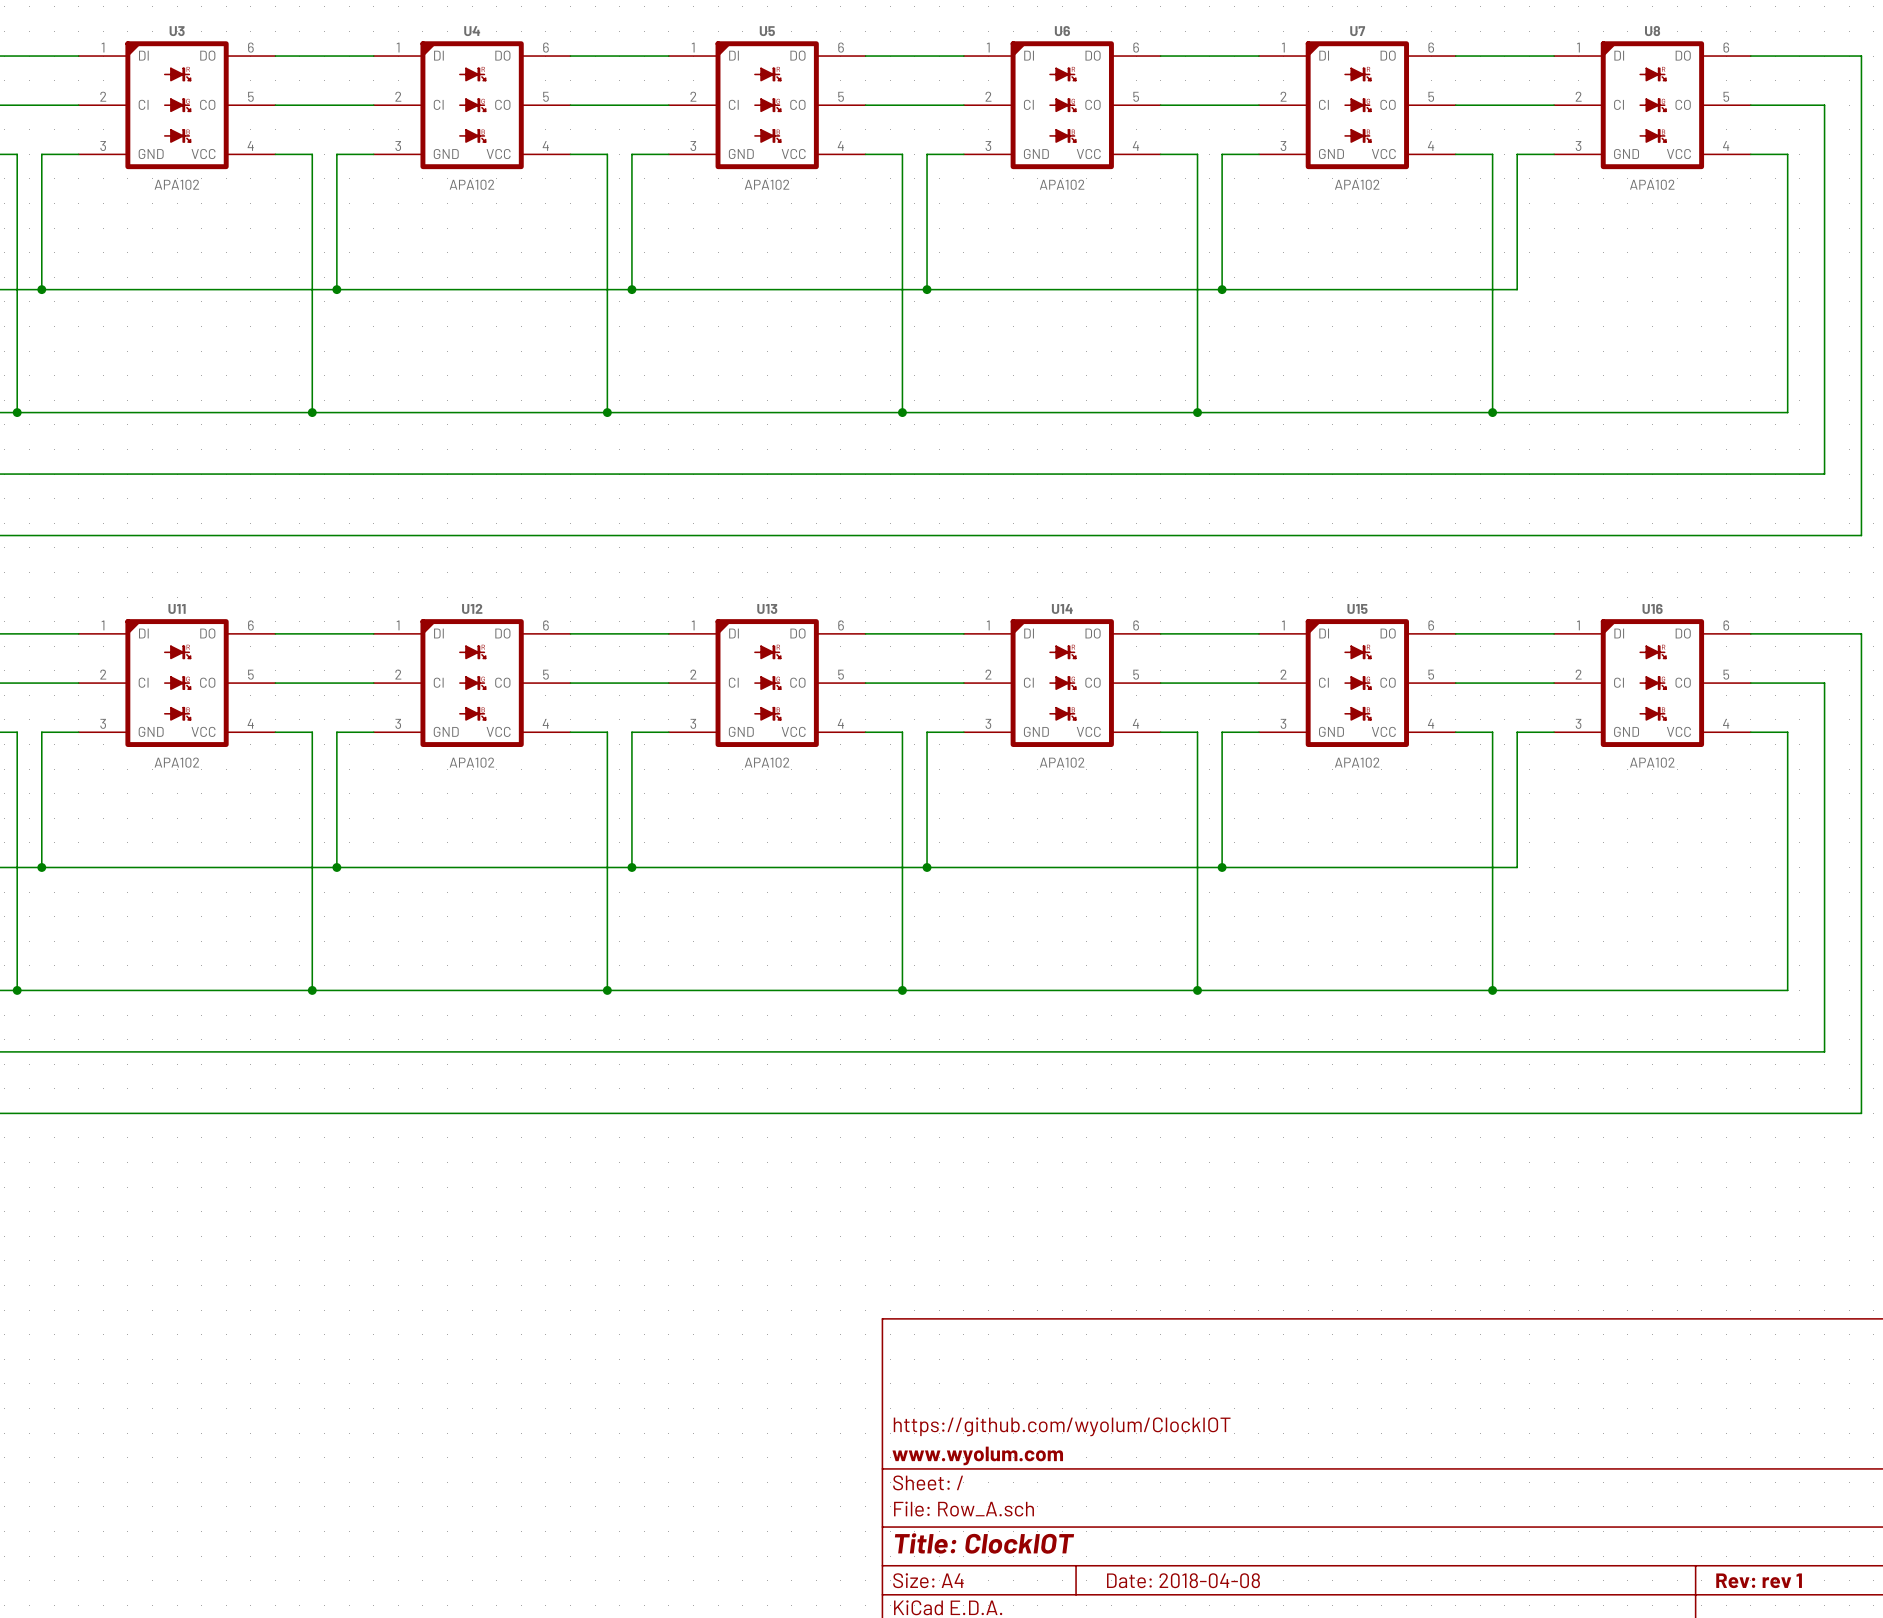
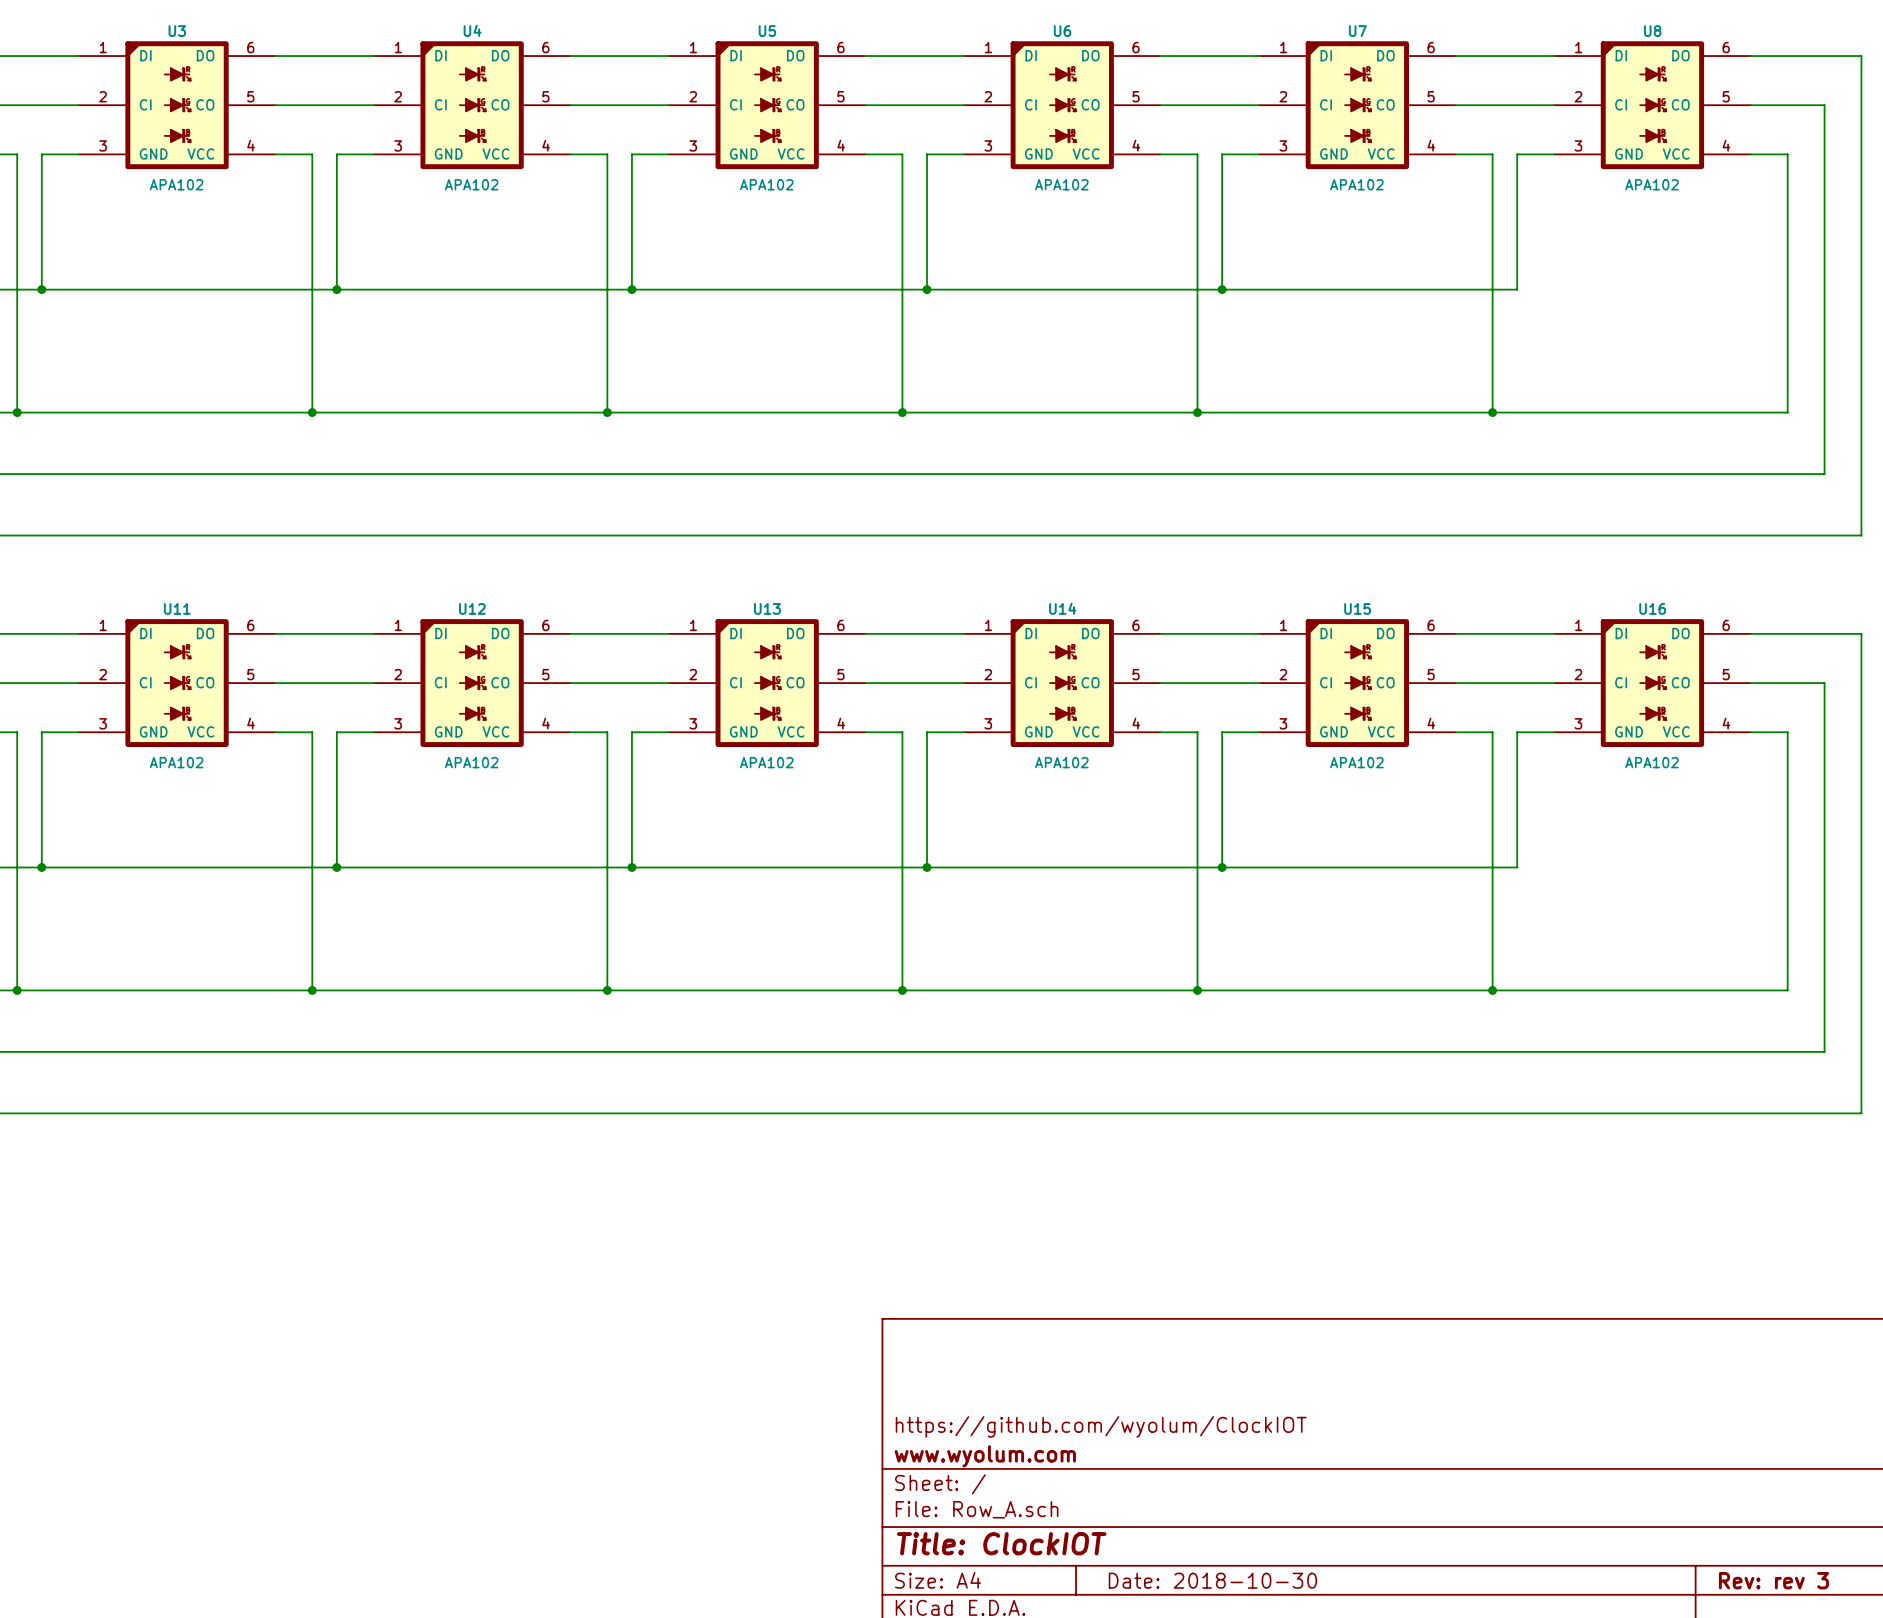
title block: Date: 2018-04-08 (1183, 1580) -> Date: 2018-10-30 (1212, 1580)
title block: Rev: rev 1 (1759, 1580) -> Rev: rev 3 (1773, 1580)

